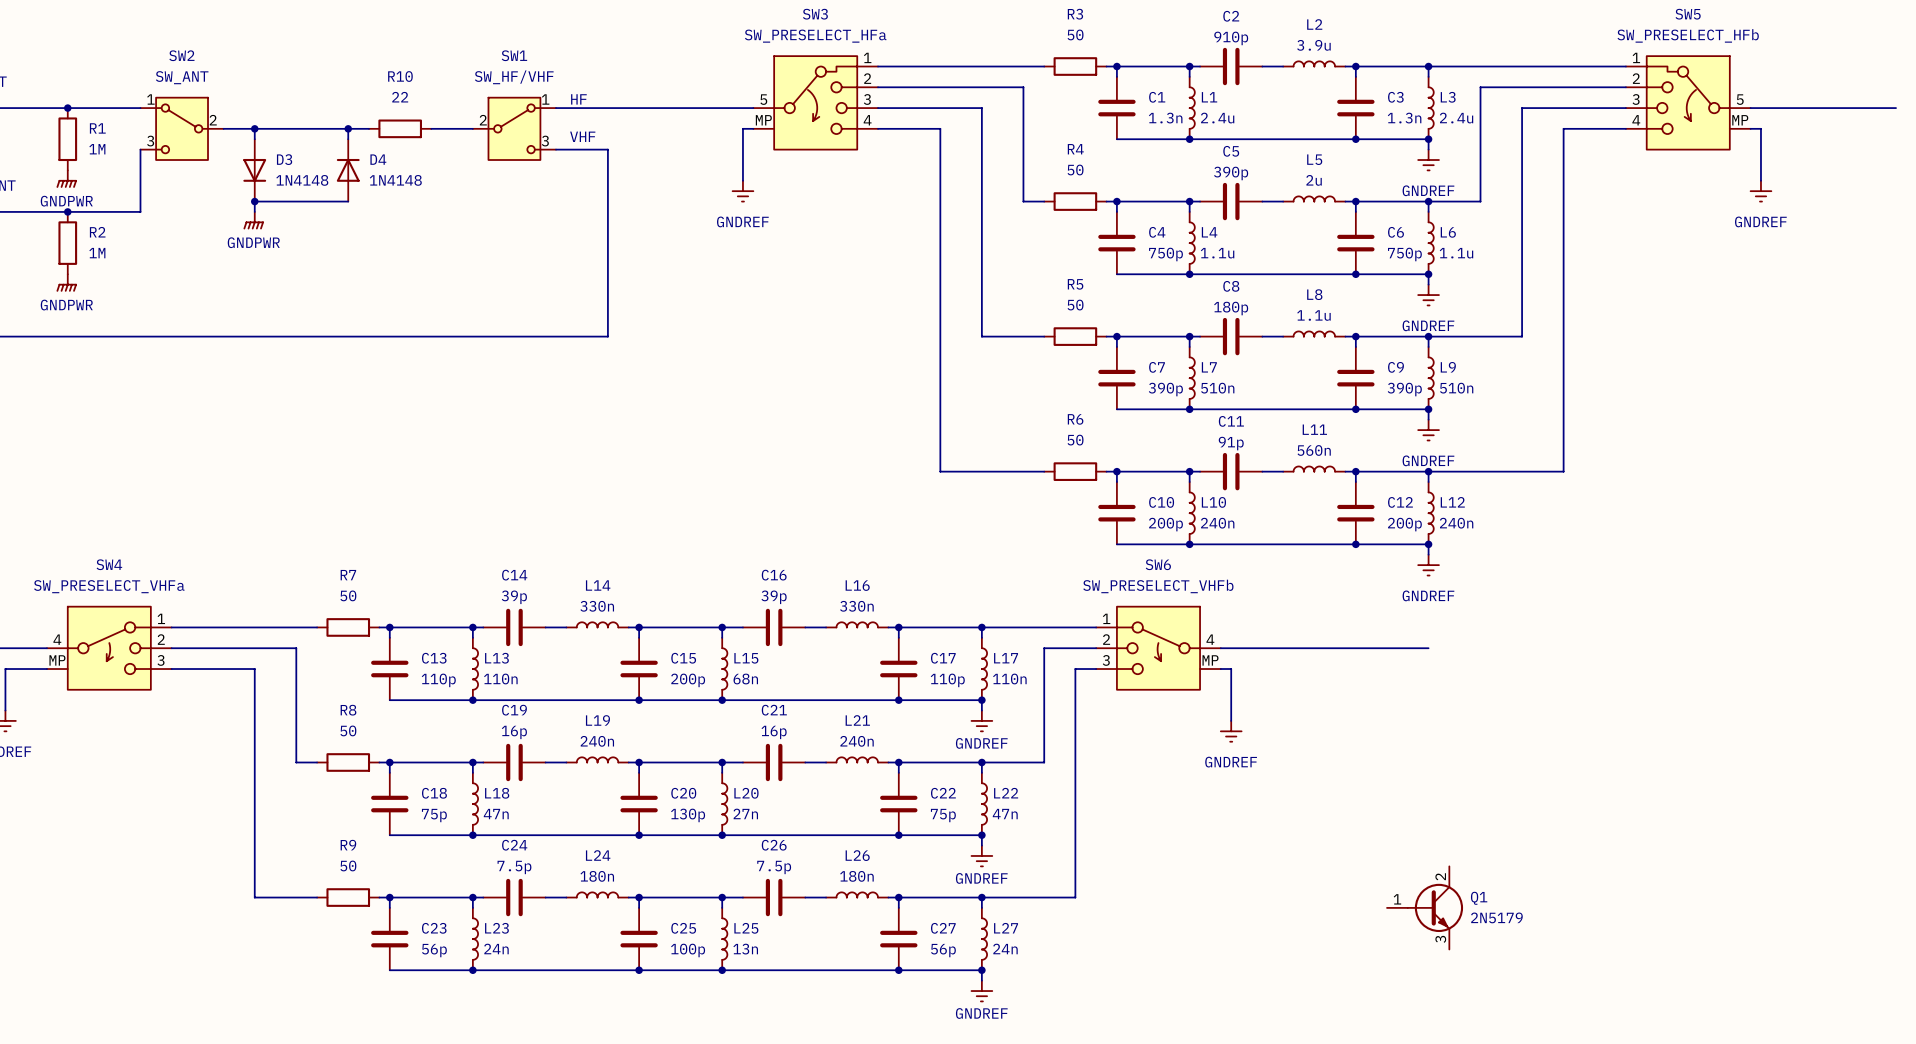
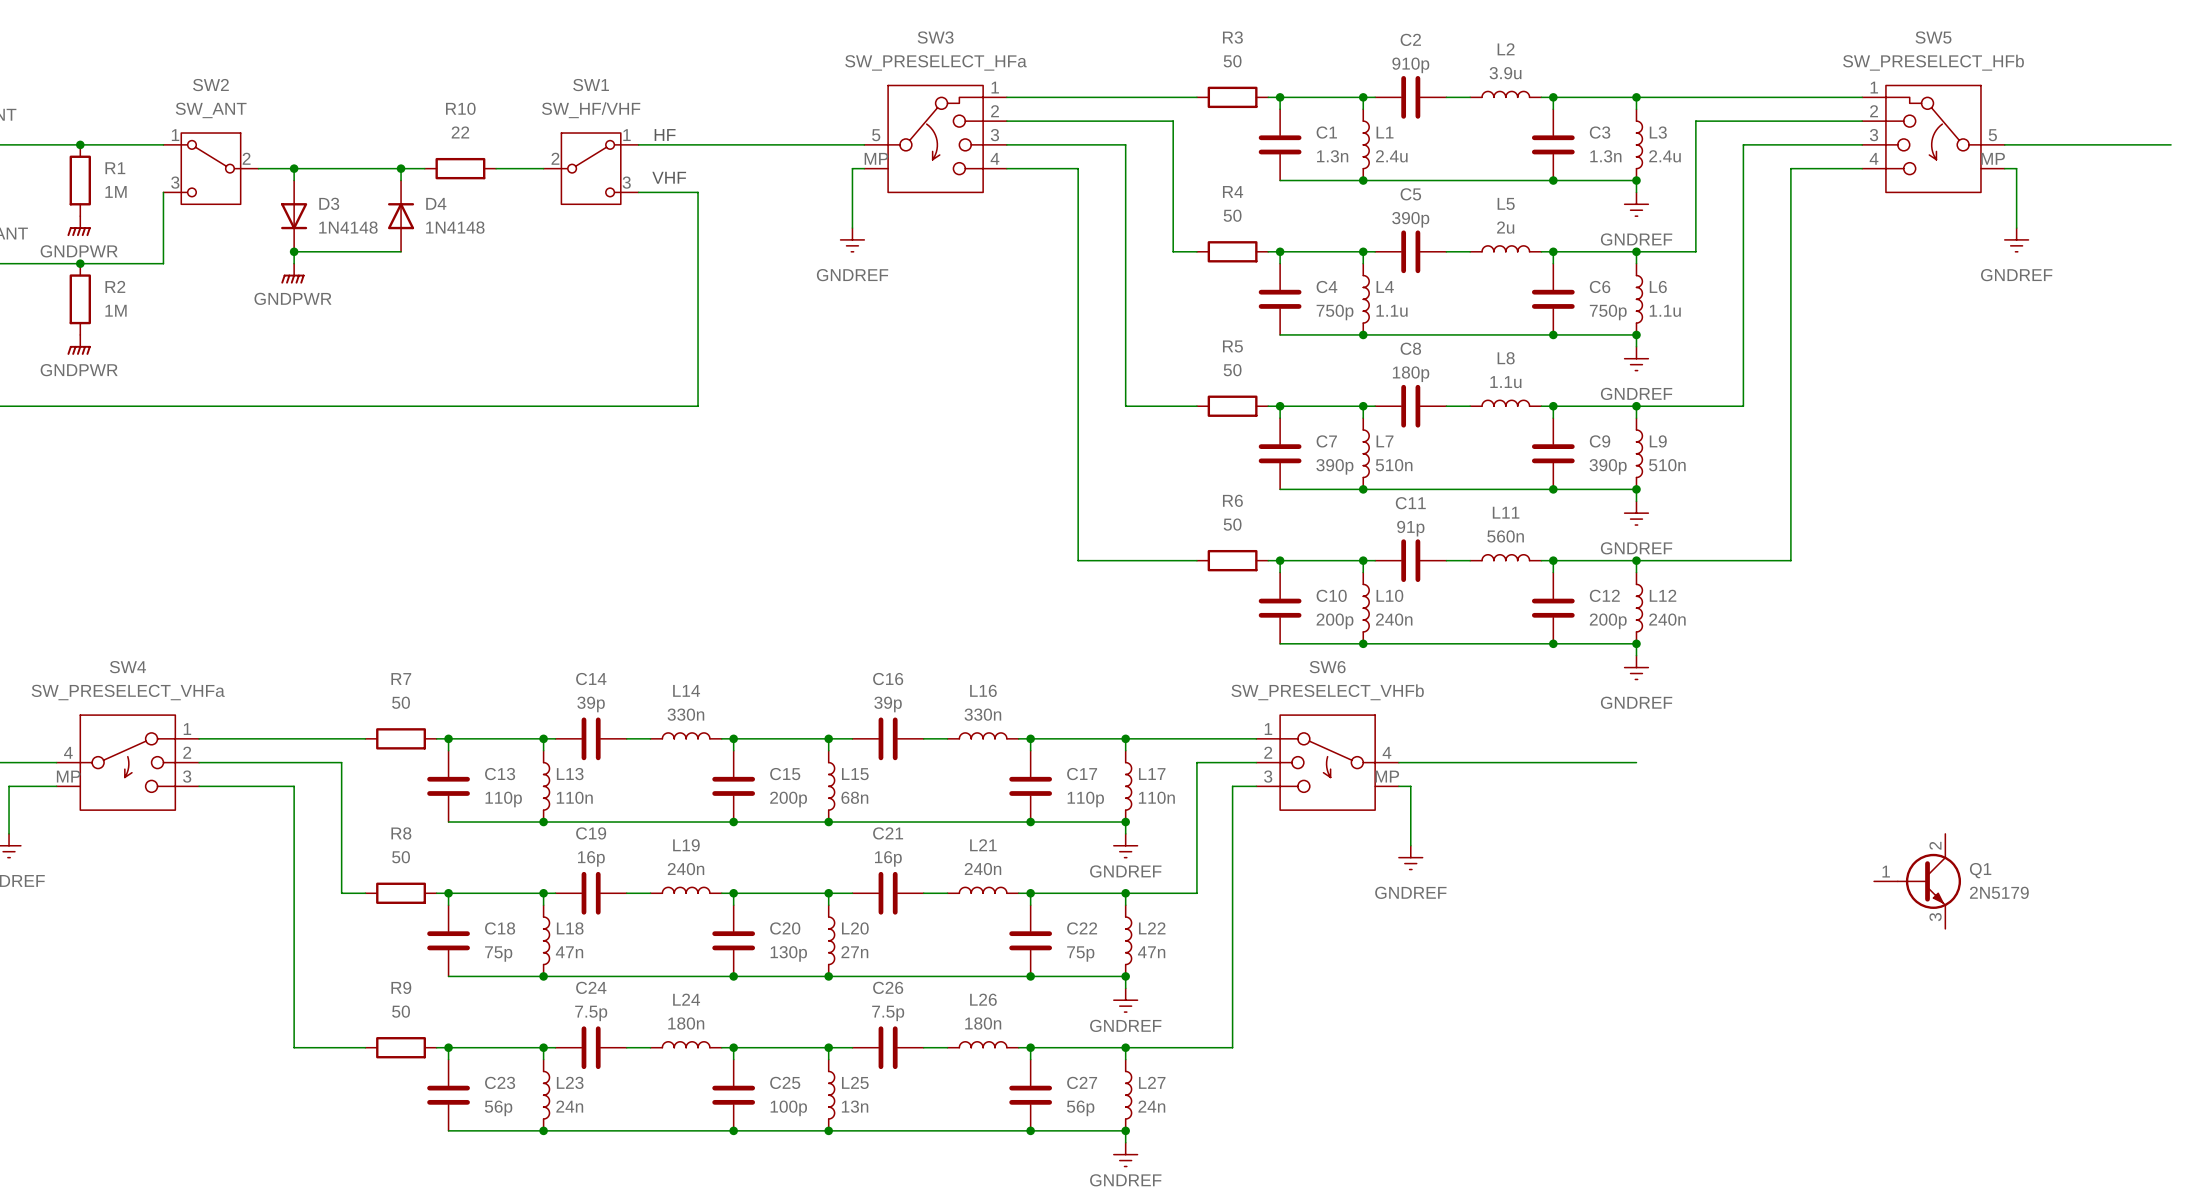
Q1 position: (1425, 907) -> (1917, 881)

